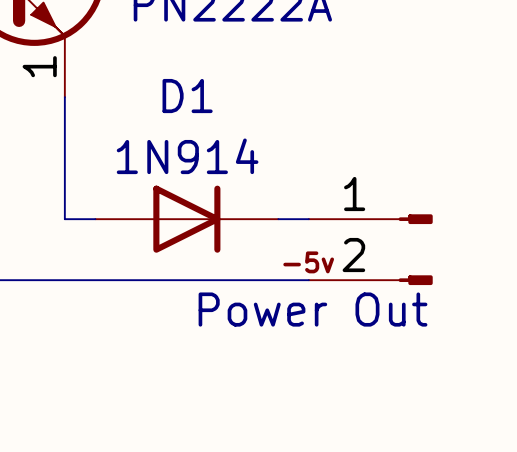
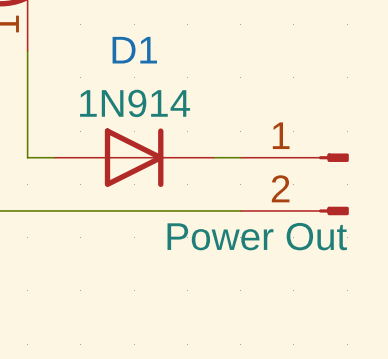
label: -5v (308, 262) -> none

